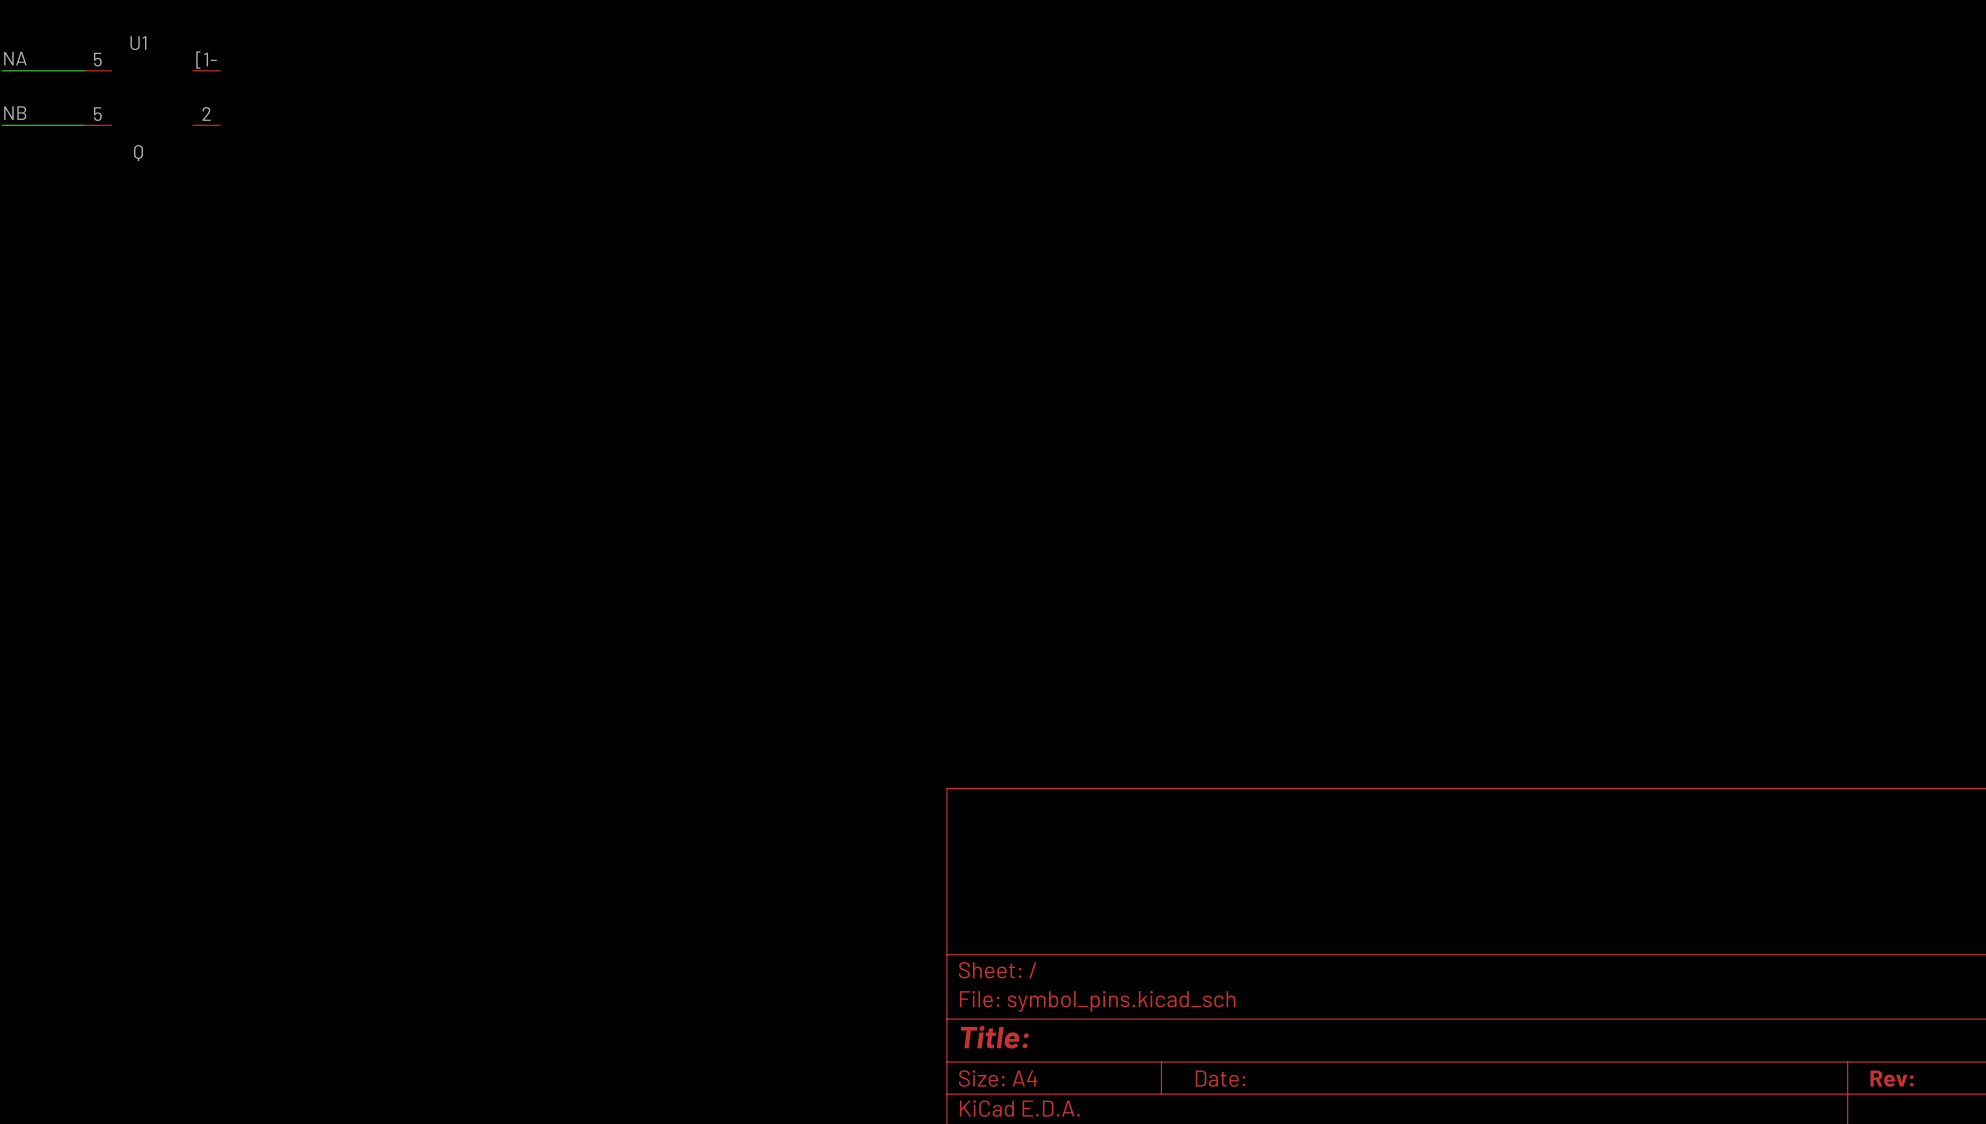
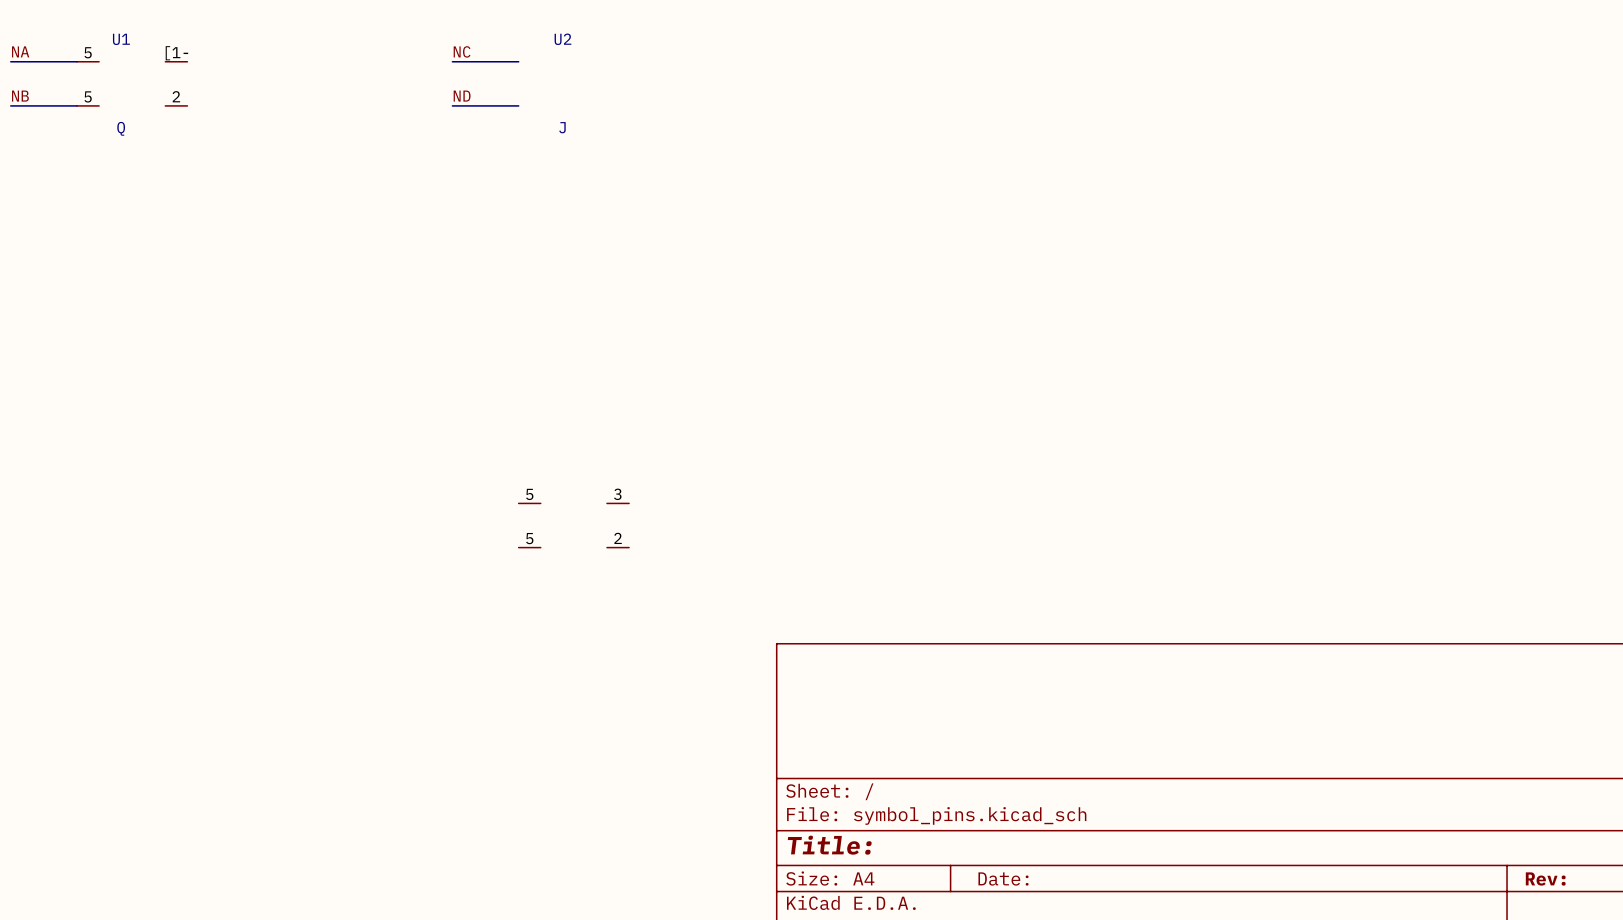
label: none -> NC (462, 51)
wire: none -> (452, 61) (518, 61)
label: none -> ND (462, 96)
wire: none -> (452, 105) (518, 105)
U2: none -> J (573, 525)

